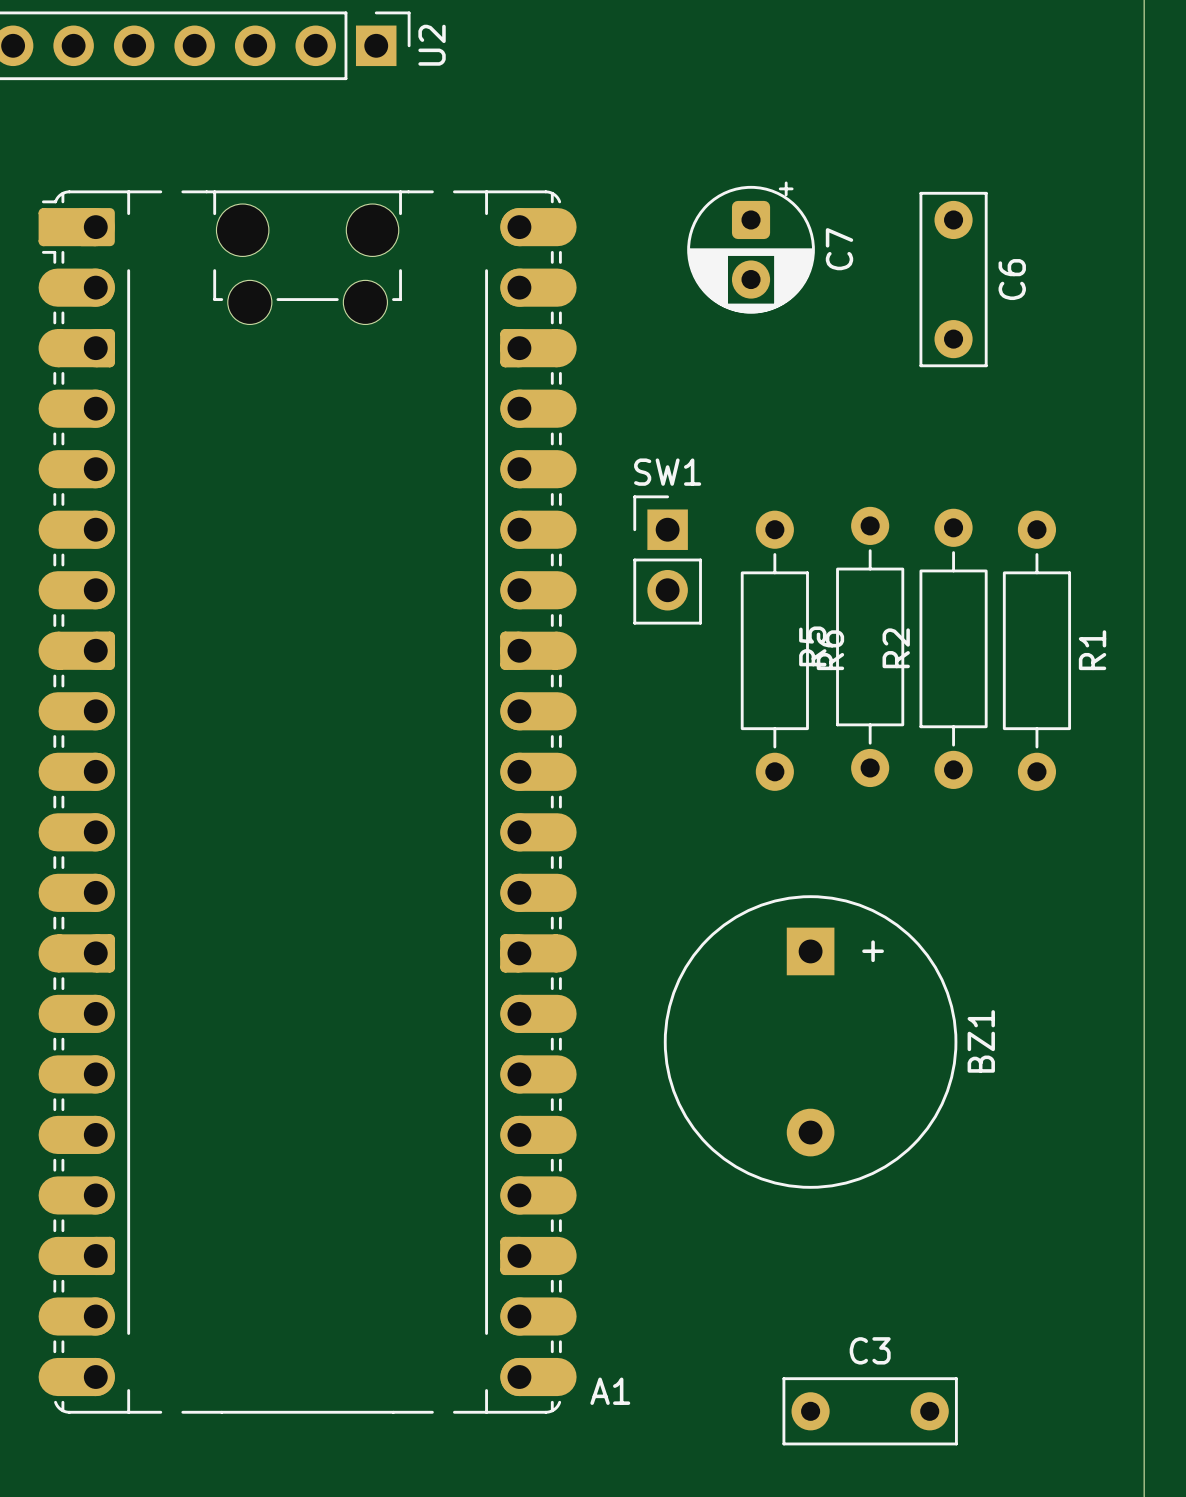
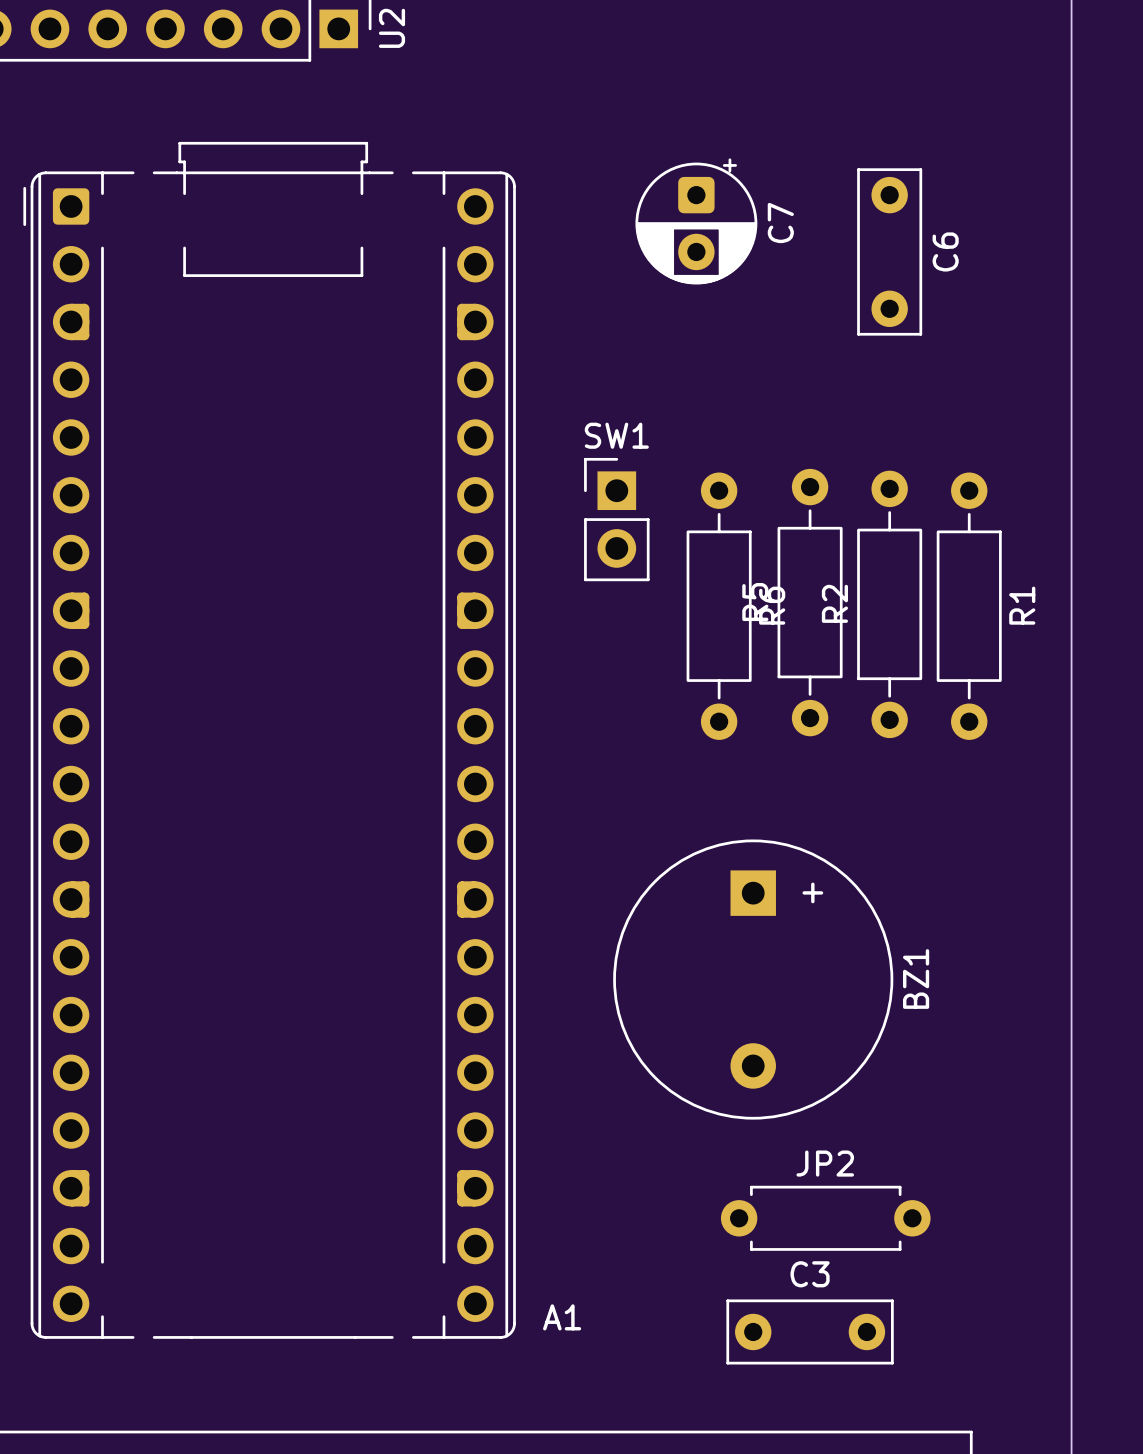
A1 footprint: [38, 190, 577, 1414] -> [23, 141, 516, 1339]
JP2: none -> (825, 1218)

